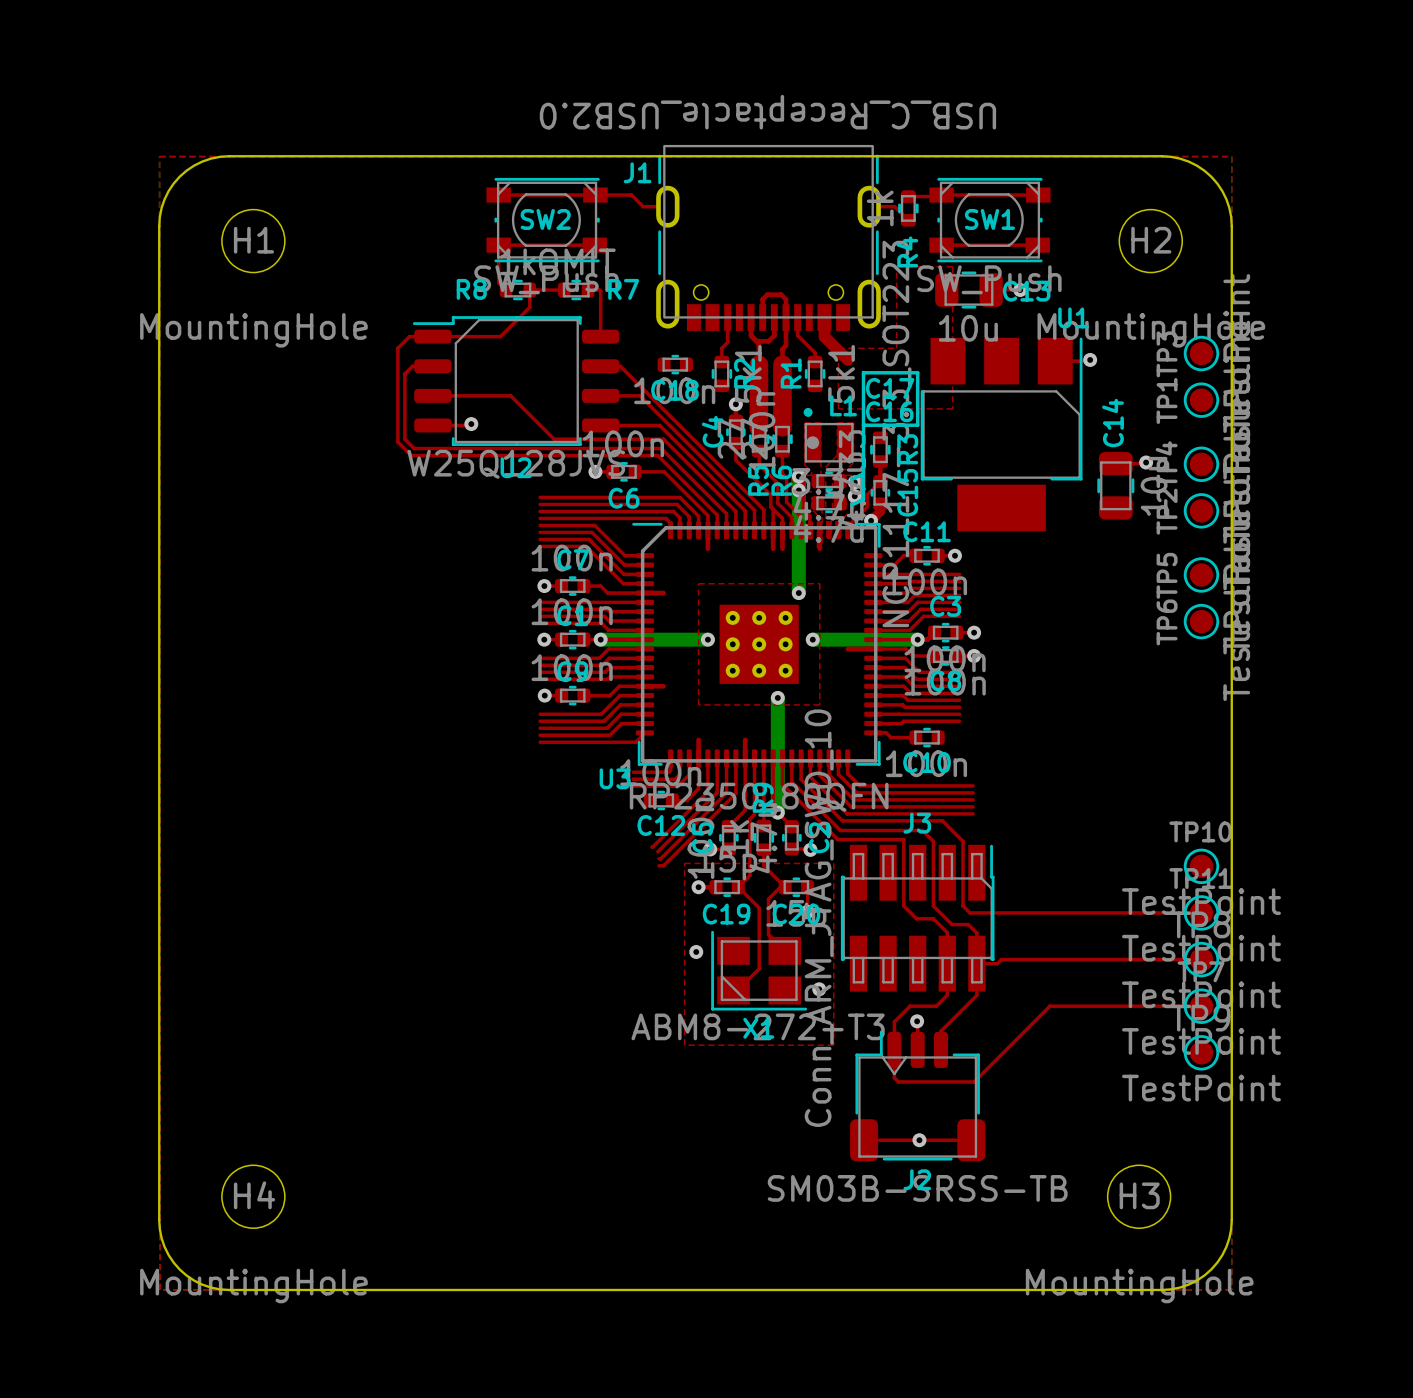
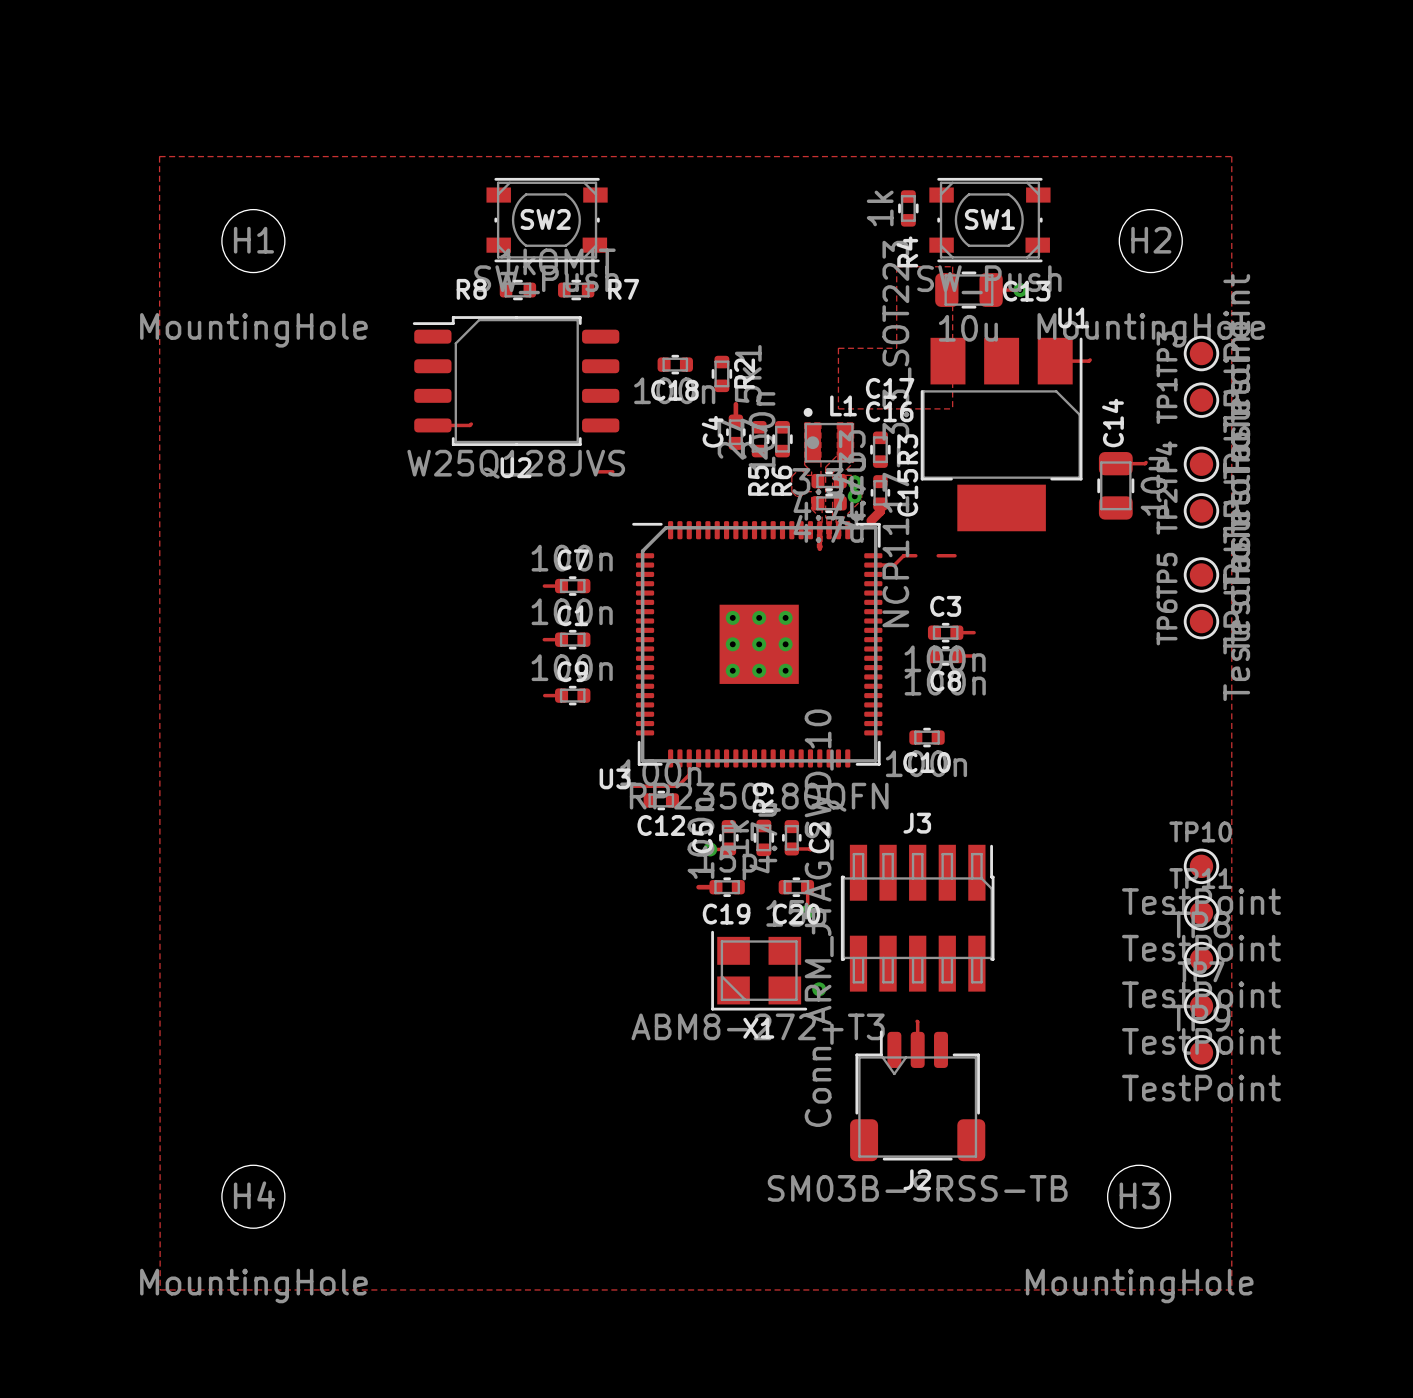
board edge: (229, 156) (1161, 156) (1188, 161) (1204, 170) (1217, 183) (1229, 208) (1231, 226) (1231, 1220) (1229, 1238) (1222, 1255) (1204, 1275) (1188, 1284) (1161, 1289) (229, 1289) (211, 1287) (194, 1280) (173, 1262) (161, 1238) (159, 1220) (159, 226) (164, 199) (179, 176) (202, 161) (229, 156) -> none
top track: (498, 195) (631, 195) (643, 206) (667, 206) -> none
top track: (1038, 195) (908, 196) -> none
top track: (869, 206) (894, 206) (908, 220) -> none
J1: USB_C_Receptacle_USB2.0 (768, 237) -> none
top track: (594, 245) (498, 245) (498, 282) (506, 290) -> none
top track: (941, 245) (1037, 245) -> none
top track: (564, 290) (529, 290) (529, 307) (500, 336) (409, 336) (397, 348) (397, 442) (411, 455) (657, 455) (717, 514) (717, 530) -> none
top track: (588, 290) (600, 291) (600, 336) -> none
top track: (727, 317) (727, 342) (721, 348) (721, 362) -> none
top track: (751, 317) (751, 335) (758, 343) (759, 427) -> none
top track: (762, 317) (762, 299) (767, 294) (781, 294) (785, 299) (785, 345) (782, 349) (782, 364) -> none
top track: (774, 317) (774, 335) (768, 341) (756, 341) -> none
top track: (797, 317) (797, 335) (815, 352) (815, 362) -> none
top track: (824, 317) (824, 336) (847, 359) -> none
via: (1090, 359) -> none
top track: (782, 364) (782, 427) -> none
top track: (432, 366) (412, 366) (404, 373) (404, 439) (414, 448) (661, 448) (726, 513) (726, 530) -> none
top track: (600, 366) (620, 366) (763, 509) (763, 530) -> none
R1: 5k1 (815, 373) -> none
top track: (432, 395) (510, 395) (554, 439) (663, 439) (735, 511) (735, 530) -> none
top track: (600, 395) (640, 395) (754, 510) (754, 530) -> none
via: (735, 404) -> none
via: (471, 424) -> none
top track: (600, 425) (659, 425) (745, 510) (745, 530) -> none
line: (863, 425) (917, 425) (917, 372) (863, 372) (863, 499) (851, 505) -> none
top track: (735, 443) (735, 460) (770, 495) (770, 506) (782, 518) (782, 548) -> none
top track: (759, 451) (759, 464) (777, 483) (777, 503) (791, 517) (791, 530) -> none
top track: (782, 451) (782, 474) (786, 478) (786, 502) (800, 516) (801, 530) -> none
top track: (880, 461) (880, 481) (867, 494) (867, 507) (847, 526) -> none
via: (1146, 462) -> none
via: (595, 471) -> none
C6: 100n (623, 471) -> none
top track: (635, 471) (664, 471) (707, 515) (707, 548) -> none
line: (863, 473) (851, 479) -> none
top track: (798, 476) (803, 481) (803, 509) (809, 516) (810, 530) -> none
bottom track: (798, 476) (798, 593) -> none
via: (798, 476) -> none
via: (798, 490) -> none
top track: (540, 497) (679, 497) (698, 516) (698, 530) -> none
top track: (540, 504) (677, 504) (689, 516) (689, 530) -> none
top track: (773, 509) (773, 548) -> none
top track: (540, 511) (673, 511) (679, 517) (679, 530) -> none
top track: (540, 518) (665, 518) (670, 523) (670, 530) -> none
via: (871, 520) -> none
top track: (540, 525) (594, 525) (625, 555) (645, 555) -> none
top track: (540, 532) (591, 532) (624, 565) (645, 565) -> none
top track: (540, 539) (589, 539) (623, 574) (645, 574) -> none
top track: (540, 546) (586, 546) (623, 583) (645, 583) -> none
C11: 100n (927, 555) -> none
via: (954, 555) -> none
top track: (873, 574) (959, 574) -> none
top track: (959, 581) (873, 583) -> none
top zone outline: (698, 583) (698, 704) (819, 704) (819, 583) (698, 583) -> none
via: (544, 586) -> none
top track: (583, 586) (600, 586) (607, 593) (663, 593) -> none
top track: (959, 588) (912, 588) (907, 593) (873, 593) -> none
via: (798, 593) -> none
top track: (959, 595) (915, 595) (908, 602) (873, 602) -> none
top track: (542, 602) (645, 602) -> none
top track: (959, 602) (917, 602) (908, 611) (873, 611) -> none
top track: (542, 609) (645, 611) -> none
top track: (959, 609) (920, 609) (909, 621) (873, 621) -> none
top track: (542, 616) (604, 616) (609, 621) (645, 621) -> none
top track: (959, 616) (923, 616) (909, 630) (873, 630) -> none
top track: (542, 623) (601, 623) (608, 630) (645, 630) -> none
top track: (934, 632) (927, 639) (873, 639) -> none
via: (974, 632) -> none
via: (544, 639) -> none
top track: (583, 639) (645, 639) -> none
bottom track: (600, 639) (707, 639) -> none
via: (600, 639) -> none
via: (707, 639) -> none
bottom track: (812, 639) (917, 639) -> none
via: (812, 639) -> none
via: (917, 639) -> none
top track: (645, 648) (608, 648) (599, 658) (540, 658) -> none
top track: (847, 648) (873, 648) -> none
top track: (866, 648) (906, 648) (913, 655) (934, 655) -> none
via: (974, 655) -> none
top track: (645, 658) (609, 658) (602, 665) (540, 665) -> none
top track: (873, 658) (905, 658) (919, 672) (959, 672) -> none
top track: (645, 667) (609, 667) (605, 672) (540, 672) -> none
top track: (873, 667) (904, 667) (916, 679) (959, 679) -> none
top track: (645, 676) (610, 676) (608, 679) (540, 679) -> none
top track: (873, 676) (904, 676) (913, 686) (959, 686) -> none
top track: (645, 686) (663, 686) -> none
top track: (651, 686) (619, 686) (610, 695) (583, 695) -> none
top track: (873, 686) (903, 686) (910, 693) (959, 693) -> none
via: (544, 695) -> none
top track: (645, 695) (619, 695) (601, 714) (540, 714) -> none
top track: (873, 695) (903, 695) (907, 700) (959, 700) -> none
bottom track: (777, 697) (777, 812) -> none
via: (777, 697) -> none
top track: (645, 704) (620, 704) (604, 721) (540, 721) -> none
top track: (873, 704) (959, 707) -> none
top track: (645, 714) (621, 714) (607, 728) (540, 728) -> none
top track: (873, 714) (959, 714) -> none
top track: (959, 721) (903, 721) (901, 723) (873, 723) -> none
top track: (645, 723) (621, 723) (609, 735) (540, 735) -> none
top track: (645, 732) (635, 742) (540, 742) -> none
top track: (873, 732) (886, 732) (890, 737) (915, 737) -> none
top track: (698, 739) (698, 788) (686, 800) (672, 800) -> none
top track: (745, 739) (745, 758) -> none
top track: (745, 751) (745, 810) (728, 826) -> none
top track: (670, 758) (670, 770) (668, 772) (633, 772) -> none
top track: (679, 758) (679, 774) (674, 779) (633, 779) -> none
top track: (707, 758) (707, 791) (651, 847) -> none
top track: (717, 758) (717, 792) (657, 851) -> none
top track: (726, 758) (726, 792) (658, 858) -> none
top track: (735, 758) (735, 793) (663, 865) (658, 865) -> none
top track: (754, 758) (754, 814) (749, 819) (749, 875) (738, 887) -> none
top track: (763, 758) (763, 826) -> none
top track: (773, 758) (773, 807) (791, 826) -> none
top track: (782, 758) (782, 784) (837, 839) (903, 839) (903, 905) (916, 918) (933, 918) (947, 932) (947, 995) (936, 1006) (910, 1006) (894, 1021) (894, 1077) (898, 1081) (974, 1081) (1049, 1006) (1201, 1006) -> none
top track: (791, 758) (791, 781) (840, 830) (922, 830) (933, 841) (933, 905) (952, 924) (968, 924) (976, 933) (976, 995) (940, 1031) (940, 1049) -> none
top track: (801, 758) (801, 779) (842, 820) (942, 820) (963, 841) (963, 905) (970, 912) (1201, 912) -> none
top track: (810, 758) (810, 777) (847, 813) (973, 813) -> none
top track: (819, 758) (819, 775) (851, 806) (973, 806) -> none
top track: (829, 758) (829, 774) (854, 799) (973, 799) -> none
top track: (838, 758) (838, 774) (857, 792) (973, 792) -> none
top track: (847, 758) (847, 773) (859, 785) (973, 785) -> none
via: (777, 812) -> none
top track: (763, 849) (763, 865) (785, 887) (780, 887) (768, 899) (768, 934) (784, 950) -> none
via: (810, 849) -> none
top zone outline: (684, 863) (684, 1045) (833, 1045) (833, 863) (684, 863) -> none
top track: (735, 884) (759, 907) (759, 968) (737, 990) (733, 990) -> none
via: (698, 887) -> none
via: (696, 952) -> none
top track: (1201, 959) (1001, 959) (997, 963) (976, 963) -> none
via: (917, 1021) -> none
top track: (864, 1140) (971, 1140) -> none
via: (919, 1140) -> none

